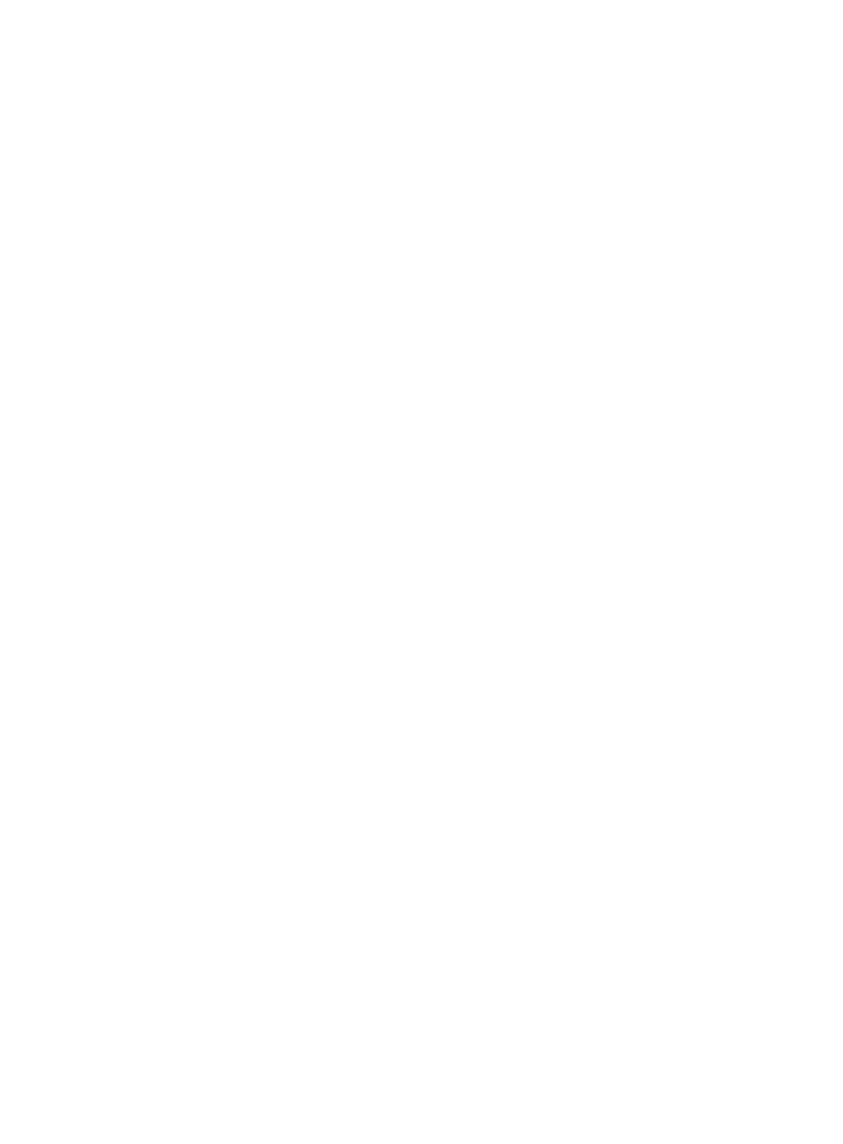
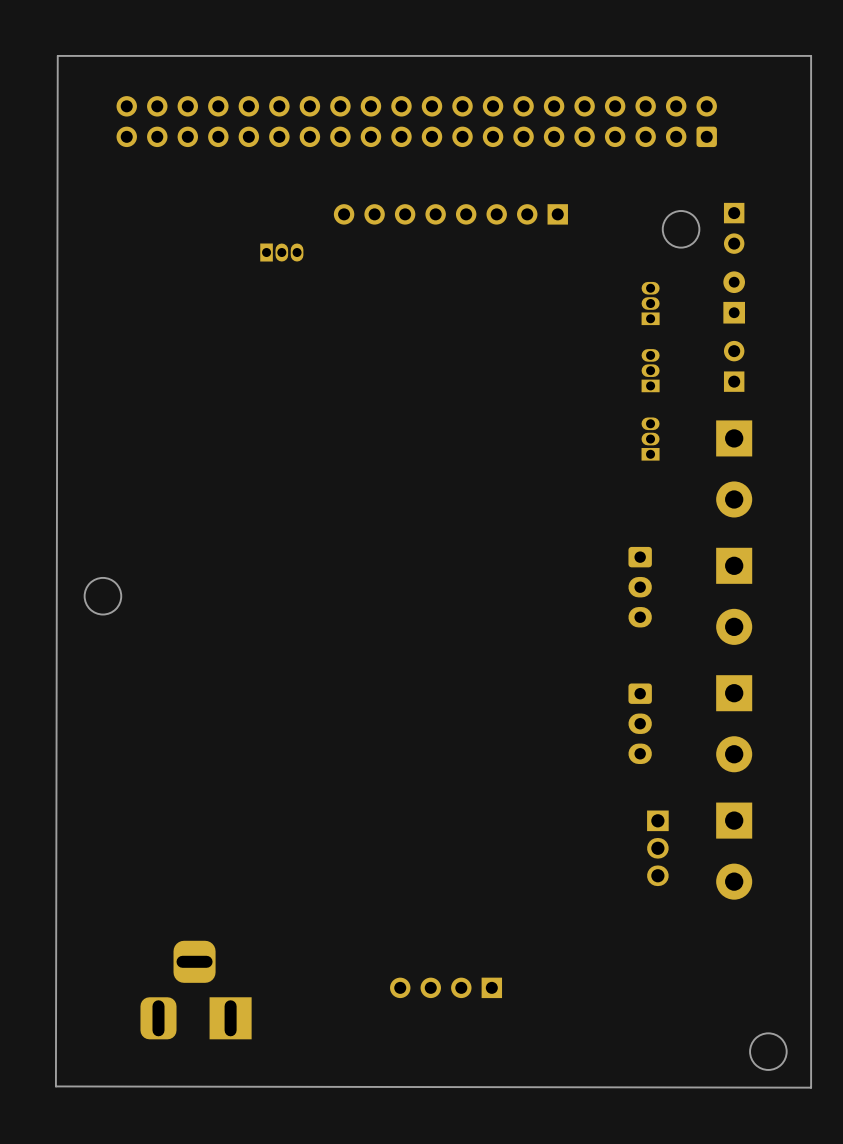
board edge: none -> (811, 55) (57, 55) (55, 1086) (811, 1087) (811, 55)
part: none -> (416, 121)
round board edge: none -> [662, 210, 700, 249]
part: none -> (450, 214)
part: none -> (734, 228)
part: none -> (281, 252)
part: none -> (734, 297)
part: none -> (650, 303)
part: none -> (734, 366)
part: none -> (650, 370)
part: none -> (650, 439)
part: none -> (734, 468)
round board edge: none -> [84, 577, 122, 616]
part: none -> (640, 587)
part: none -> (734, 596)
part: none -> (640, 723)
part: none -> (734, 723)
part: none -> (657, 848)
part: none -> (734, 851)
part: none -> (446, 987)
part: none -> (196, 990)
round board edge: none -> [749, 1032, 788, 1071]

